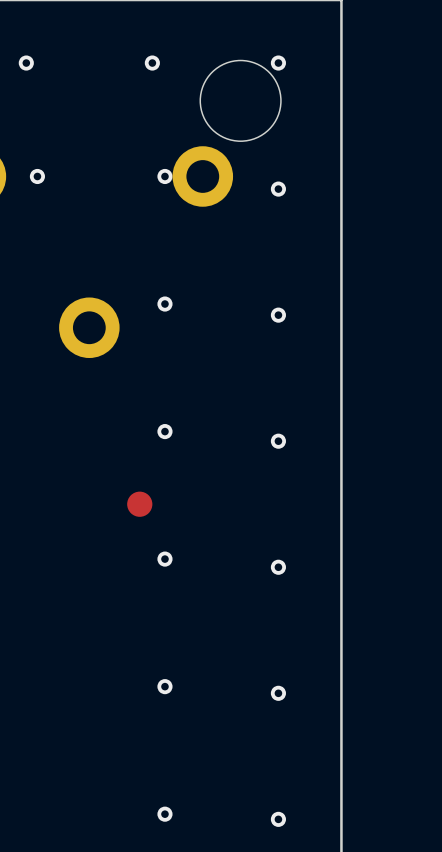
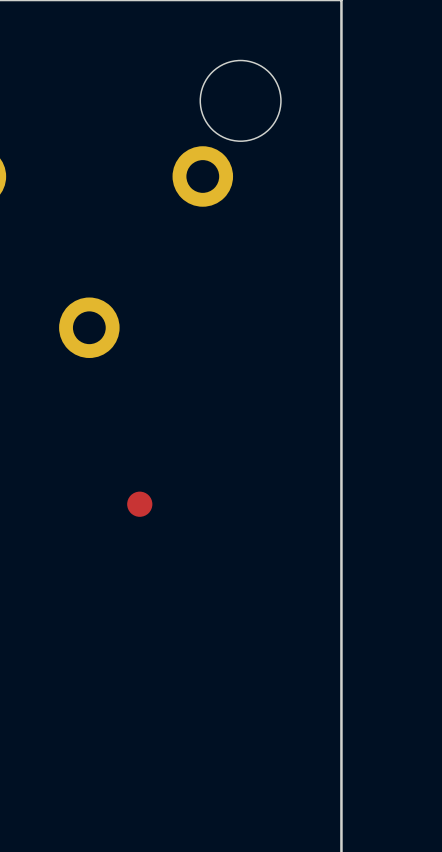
via: (26, 63) -> none
via: (152, 63) -> none
via: (278, 63) -> none
via: (37, 176) -> none
via: (164, 176) -> none
via: (278, 189) -> none
via: (164, 304) -> none
via: (278, 315) -> none
via: (164, 431) -> none
via: (278, 441) -> none
via: (164, 559) -> none
via: (278, 567) -> none
via: (164, 686) -> none
via: (278, 693) -> none
via: (164, 814) -> none
via: (278, 819) -> none

